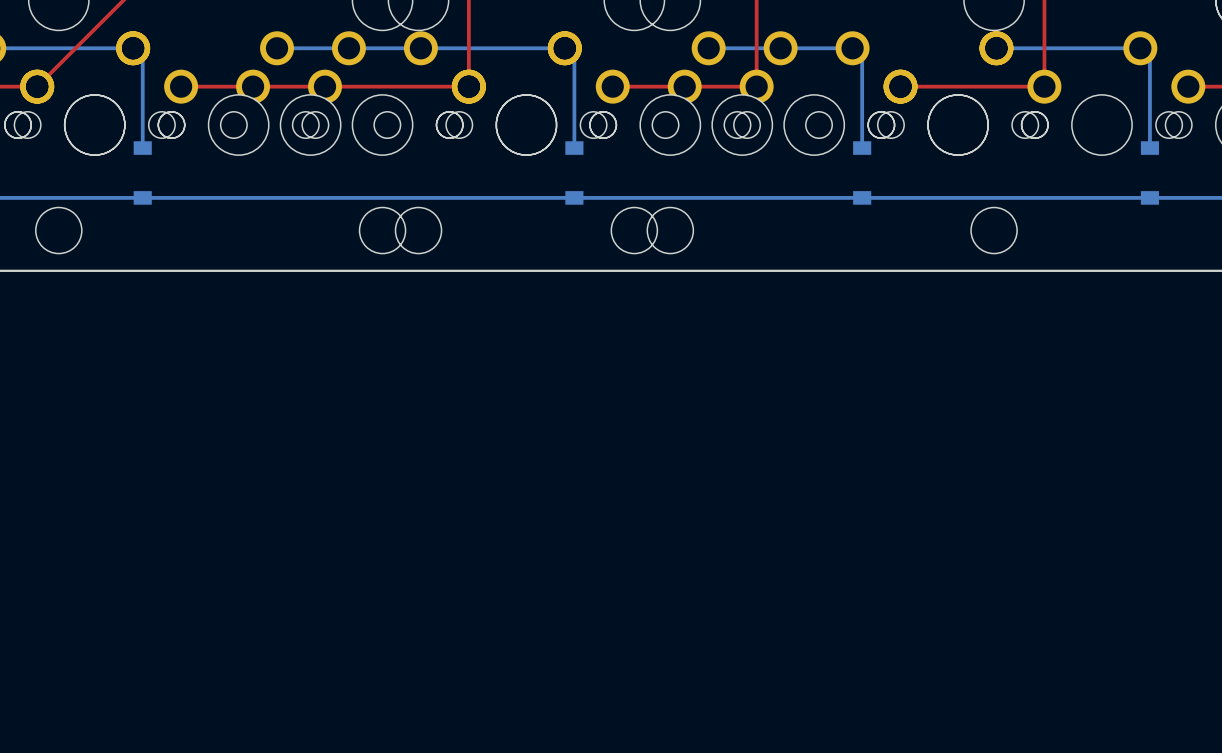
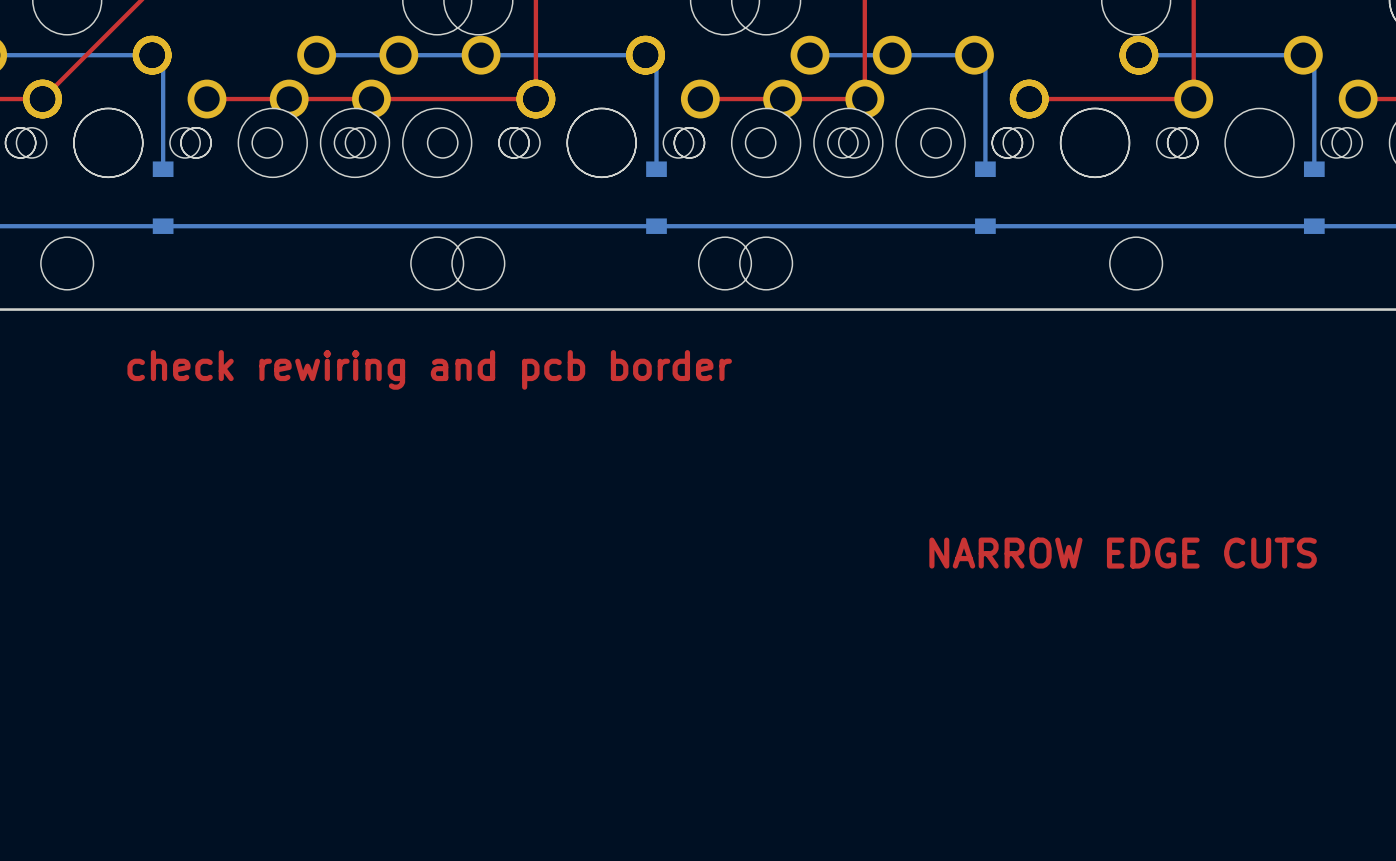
text: none -> check rewiring and pcb border (429, 369)
text: none -> NARROW EDGE CUTS (1123, 553)

